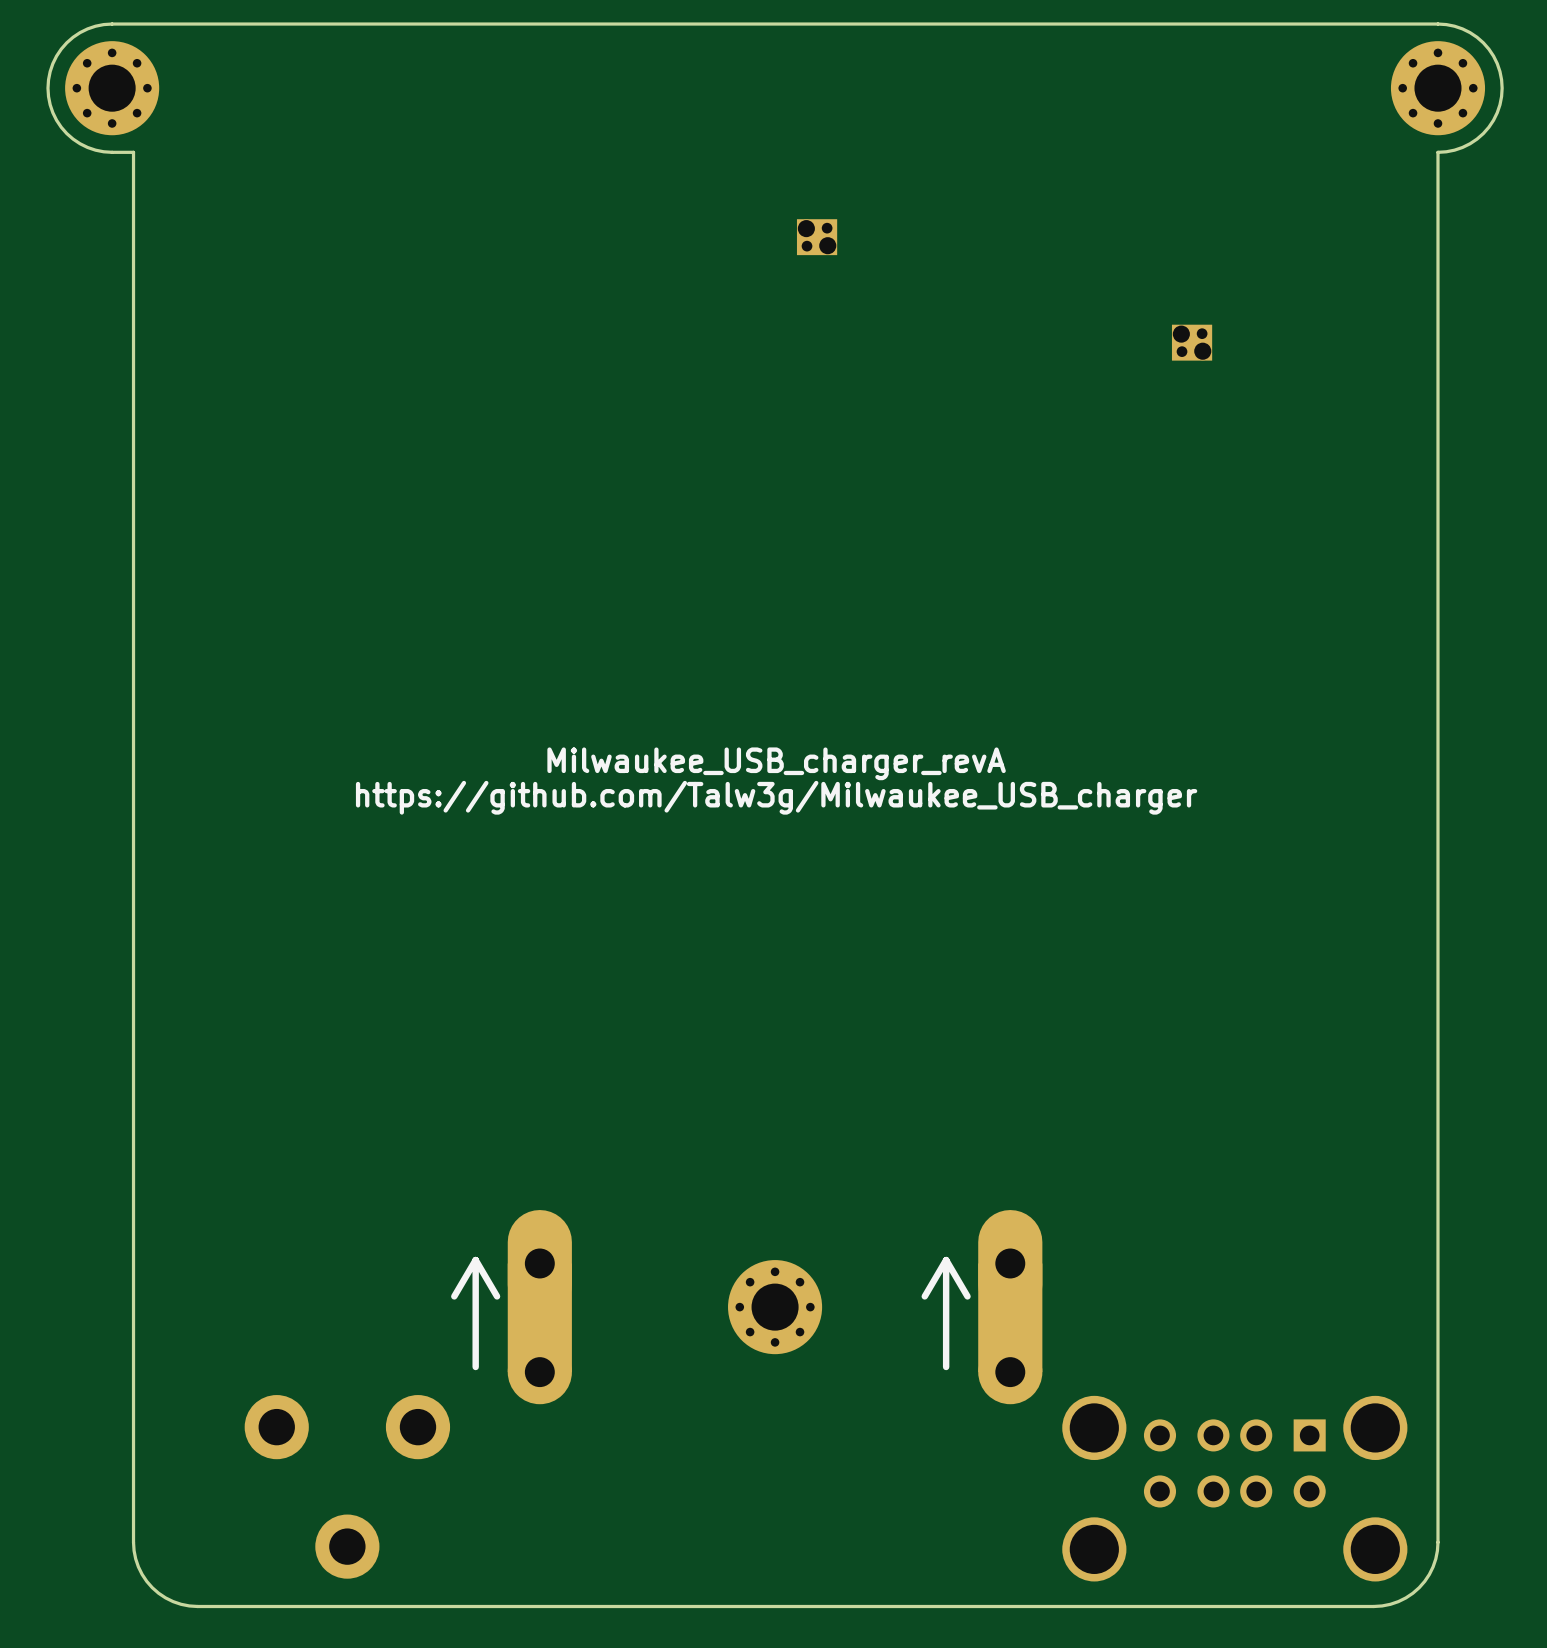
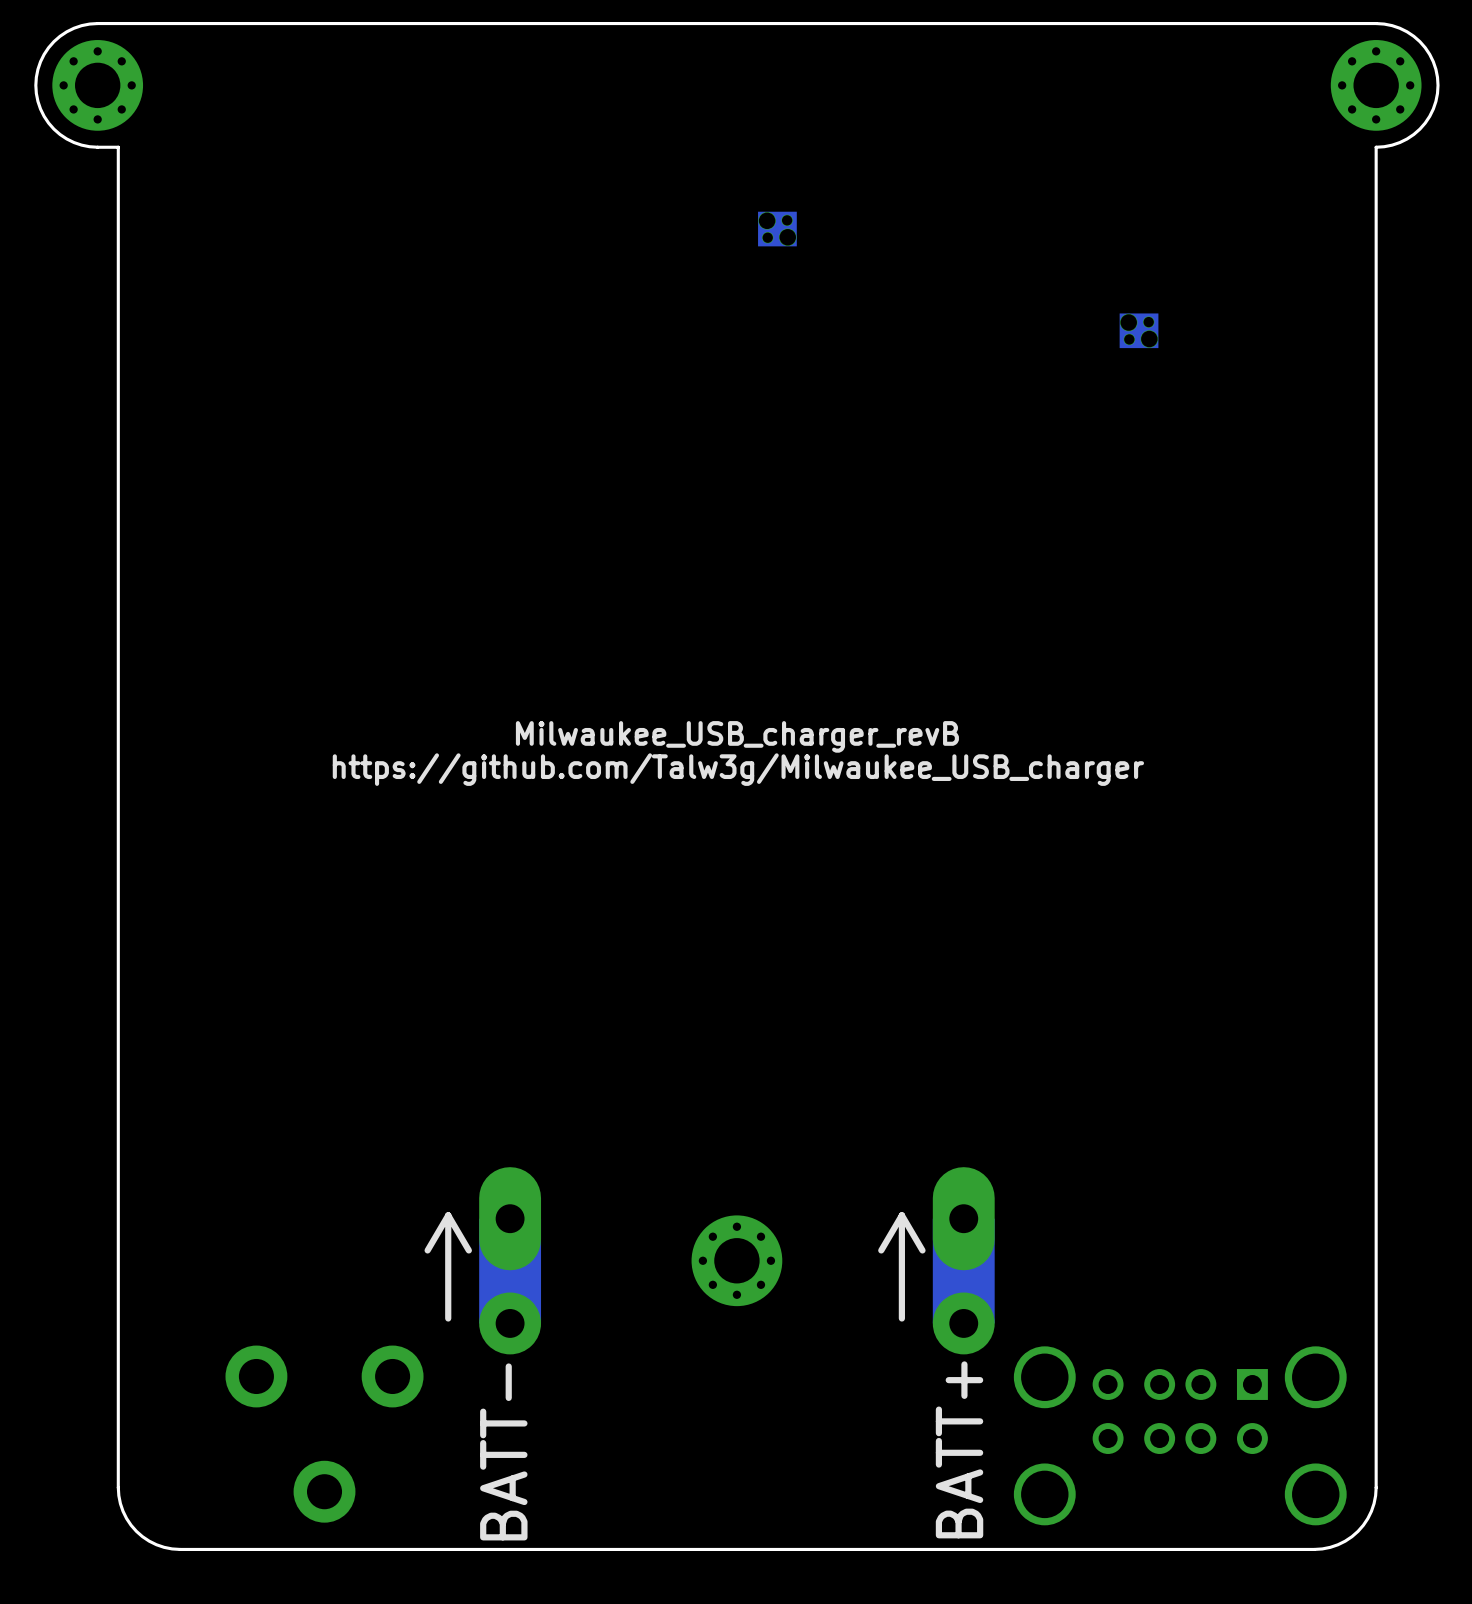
text: Milwaukee_USB_charger_revA (776, 763) -> Milwaukee_USB_charger_revB (737, 736)
part value: none -> BATT+ (959, 1449)
part value: none -> BATT- (503, 1451)

